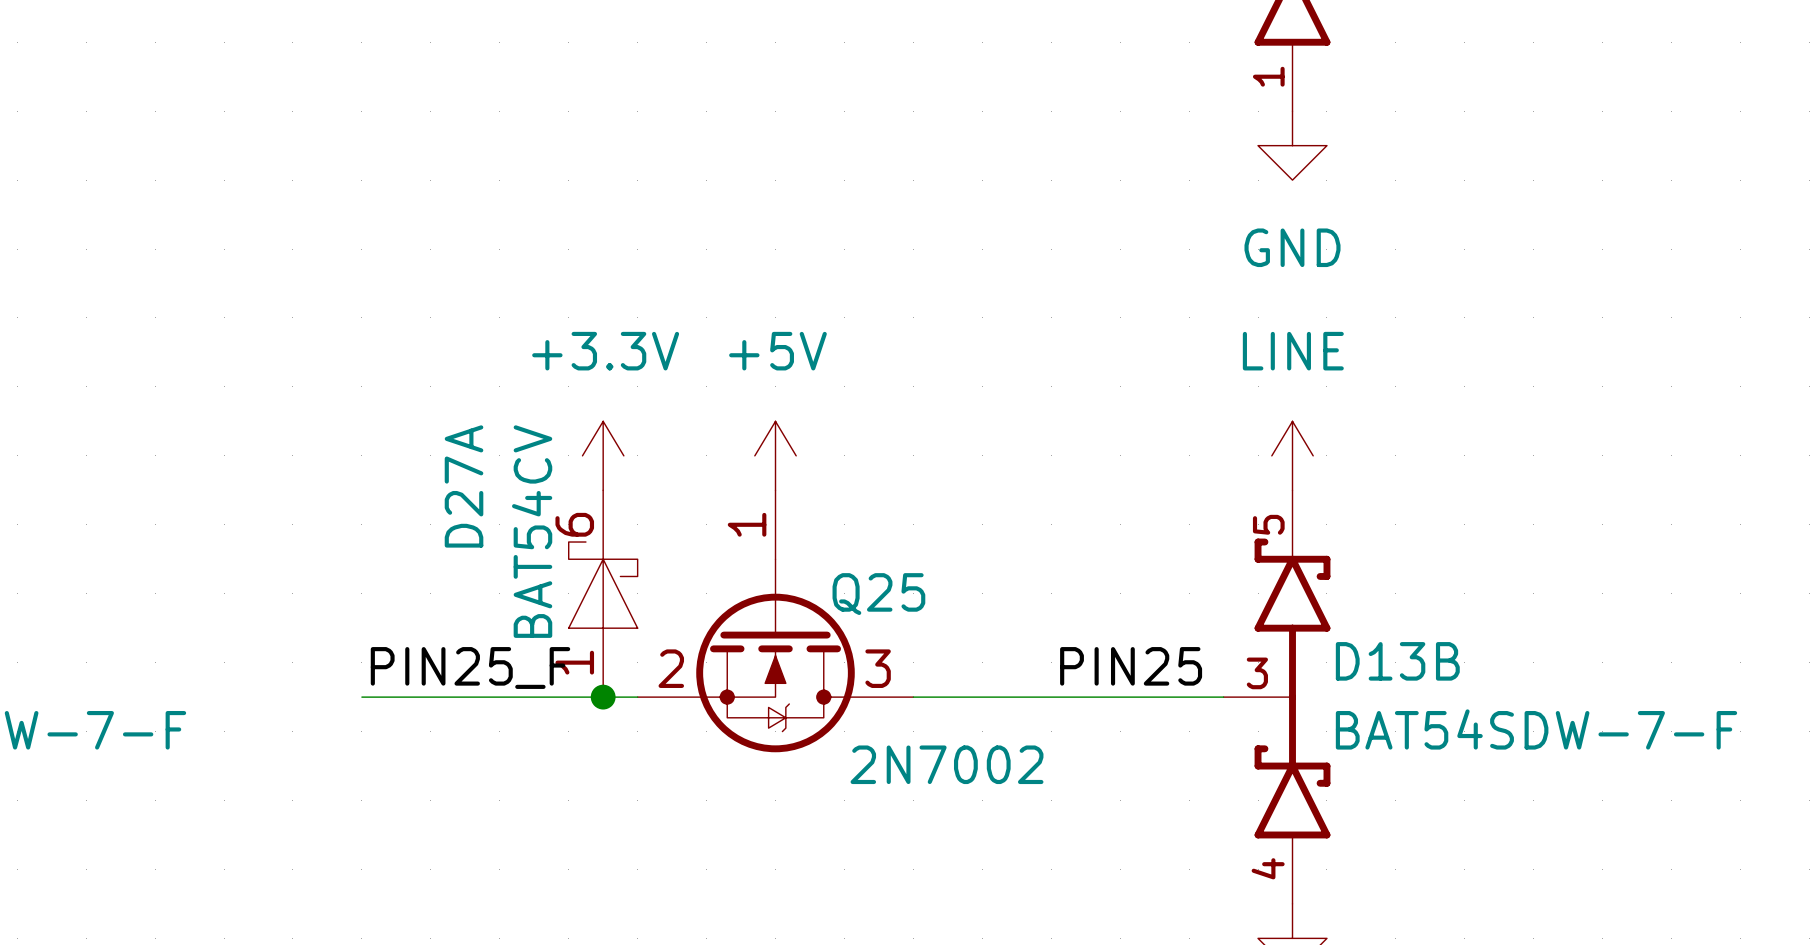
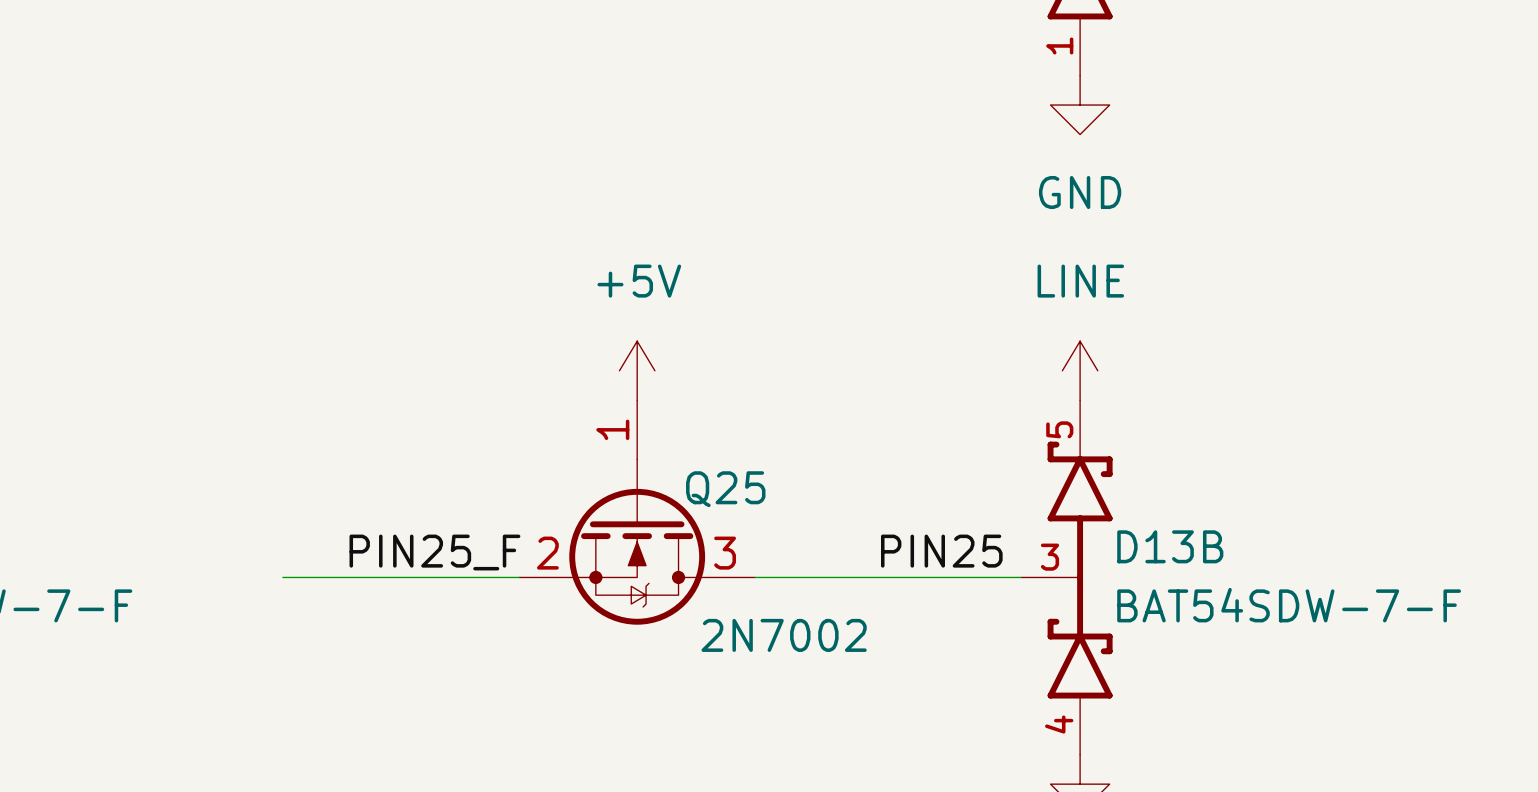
power symbol: +3.3V (603, 455) -> none
D27A: BAT54CV (603, 593) -> none
label position: PIN25_F (470, 667) -> PIN25_F (434, 552)
junction: (603, 697) -> none

